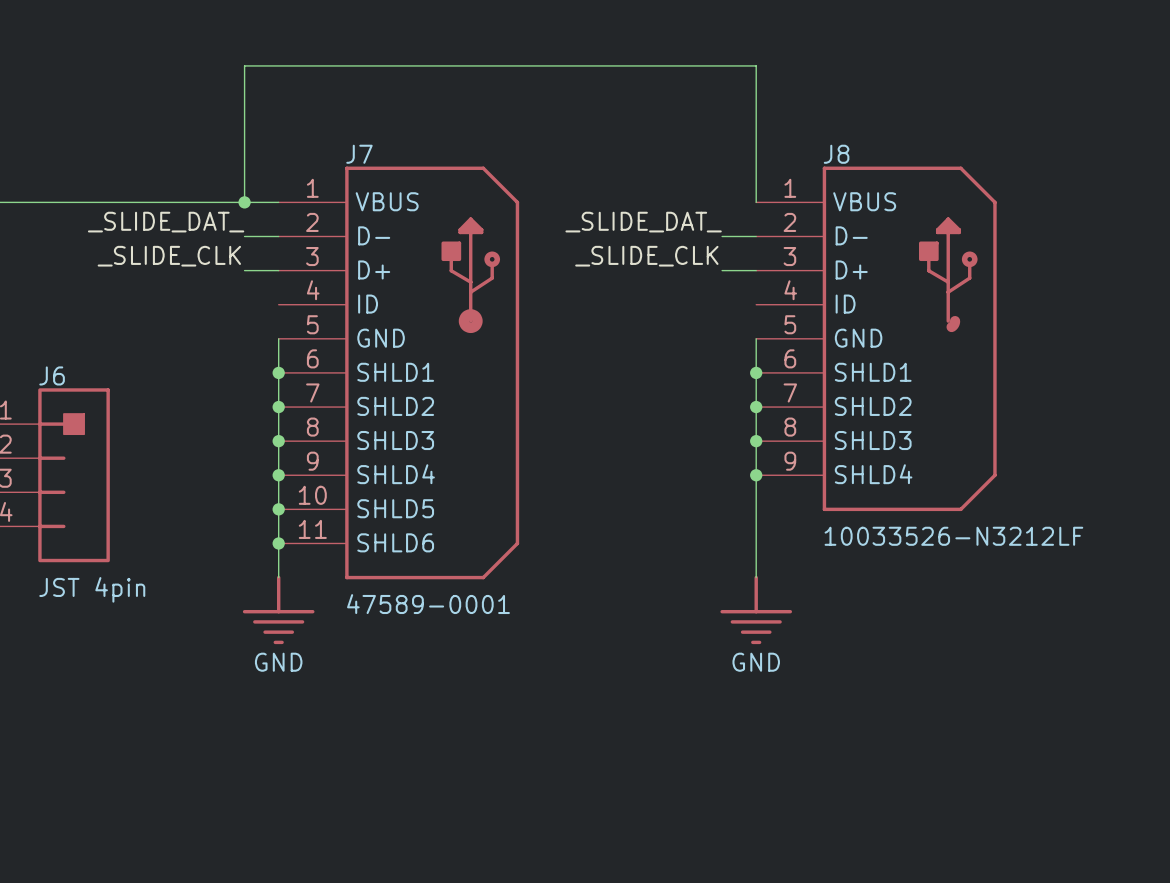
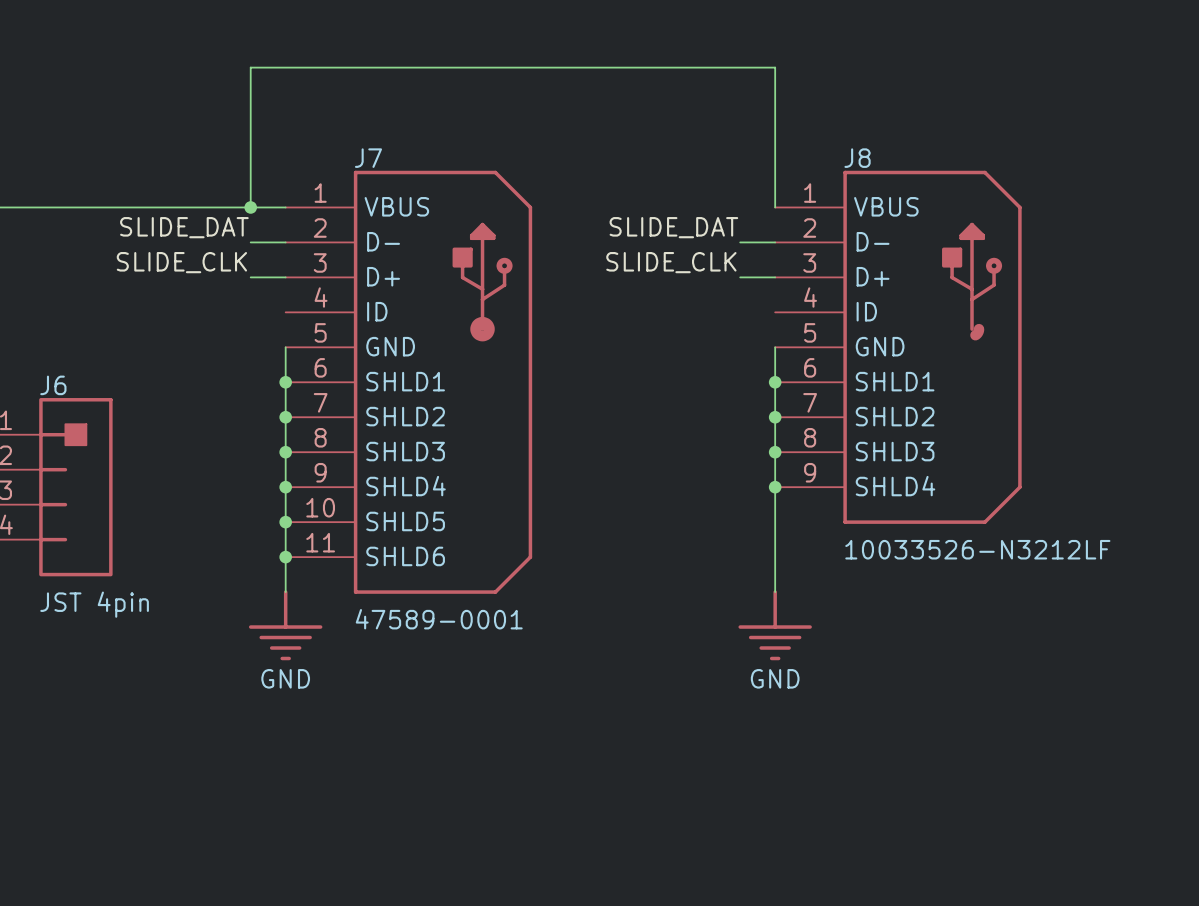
label: _SLIDE_DAT_ (166, 222) -> SLIDE_DAT (184, 227)
label: _SLIDE_DAT_ (643, 222) -> SLIDE_DAT (673, 227)
label: _SLIDE_CLK (169, 256) -> SLIDE_CLK (181, 262)
label: _SLIDE_CLK (646, 256) -> SLIDE_CLK (671, 262)

